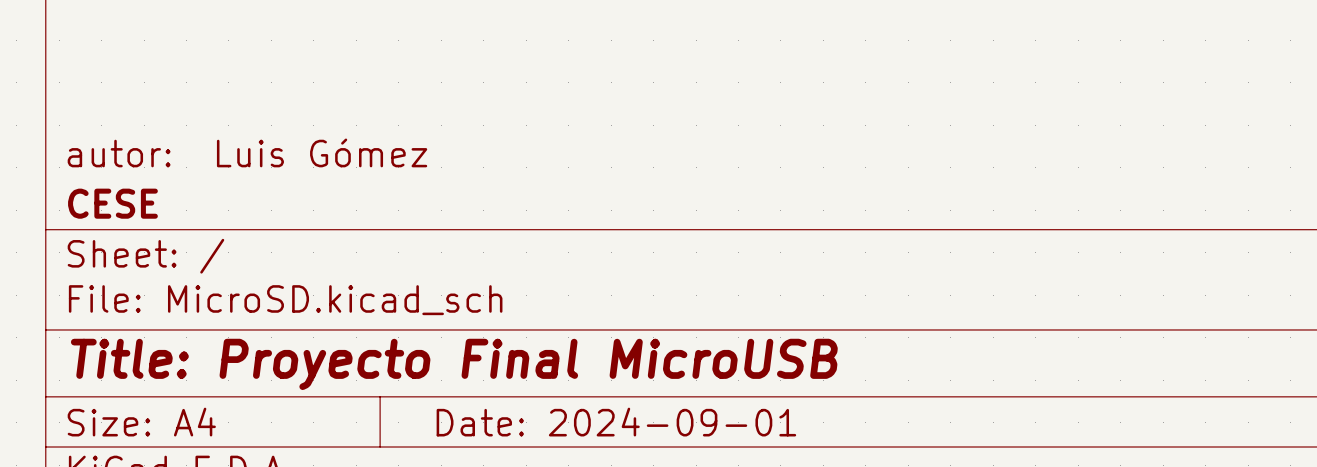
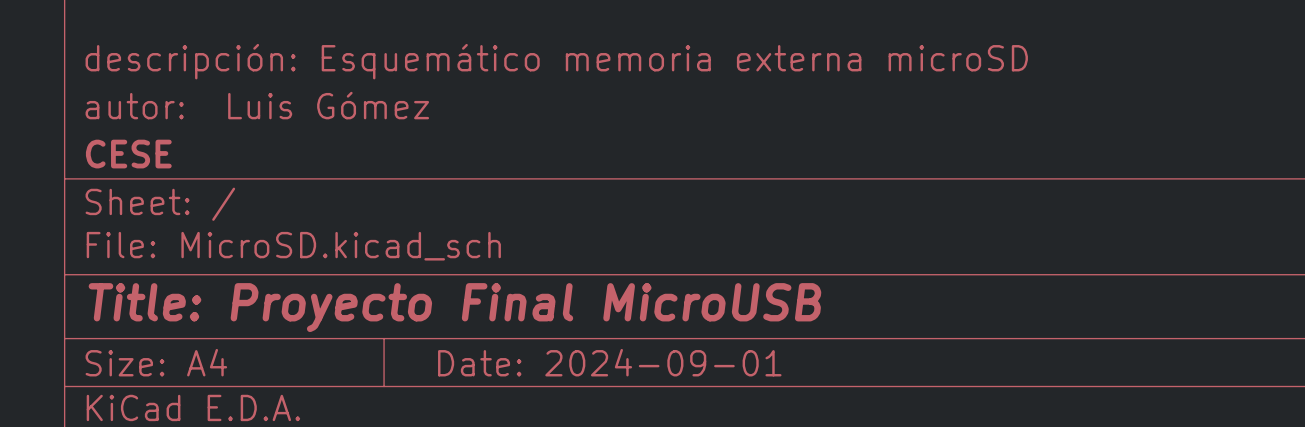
title block: none -> descripción: Esquemático memoria externa microSD (556, 61)

